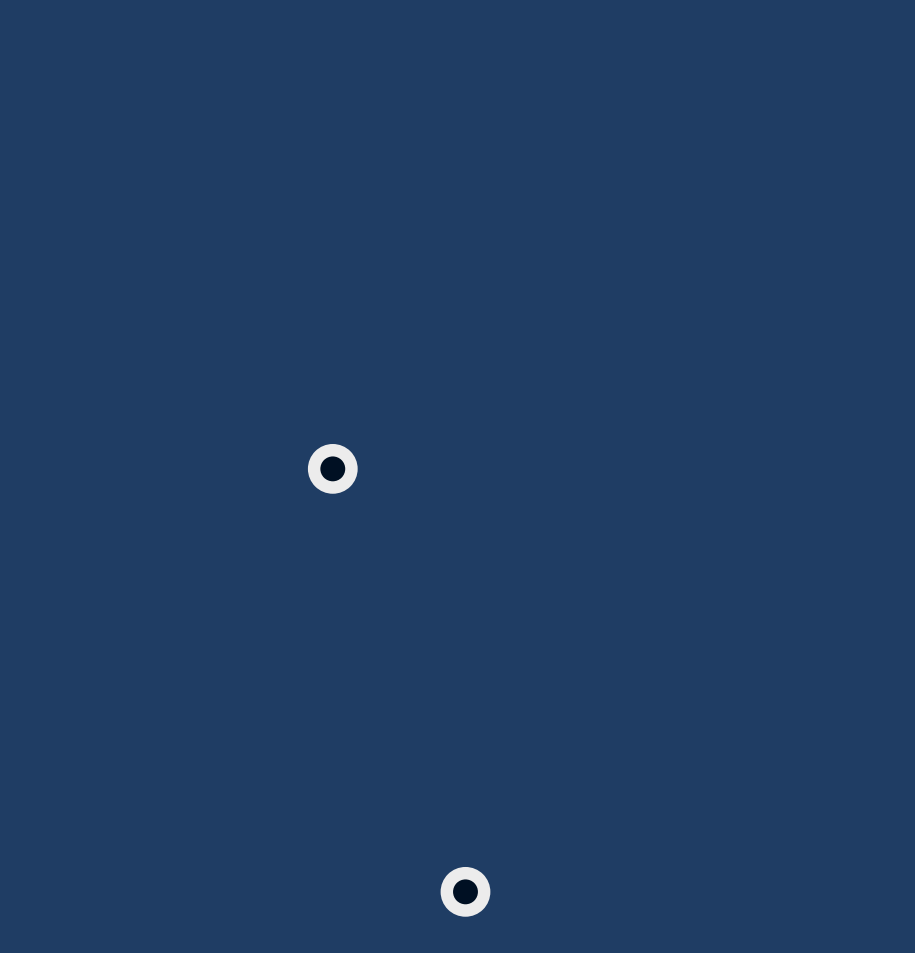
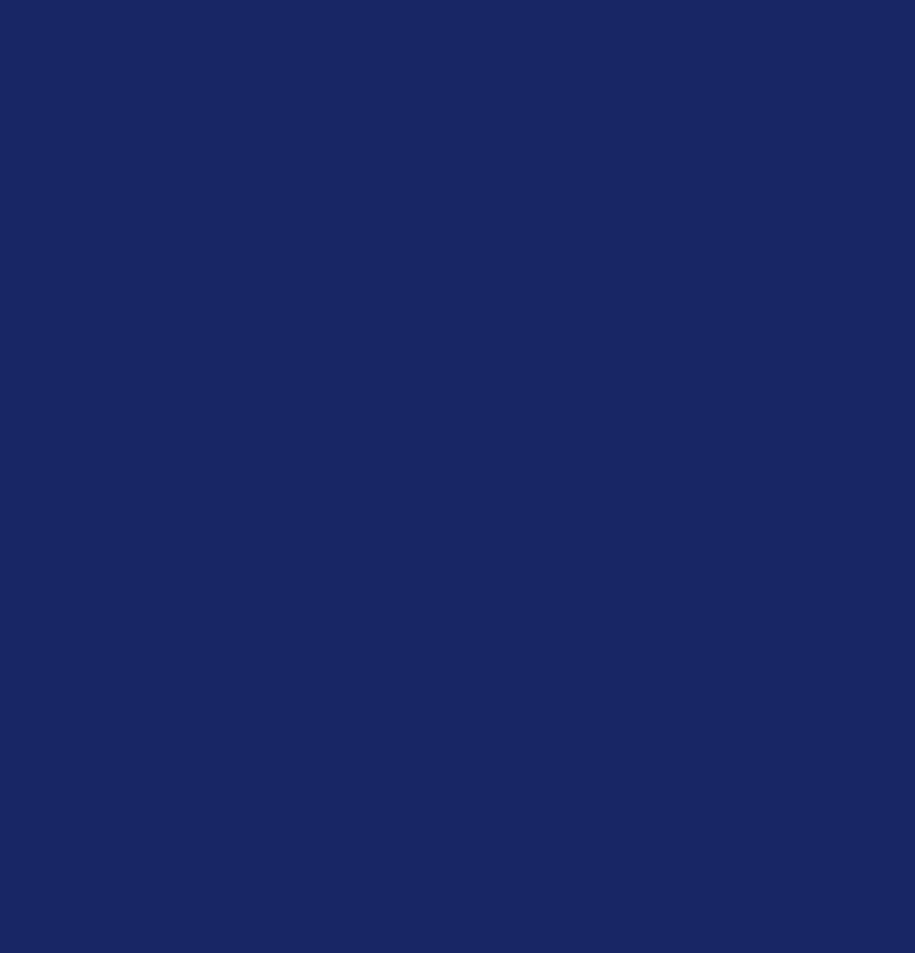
via: (332, 468) -> none
via: (465, 891) -> none

